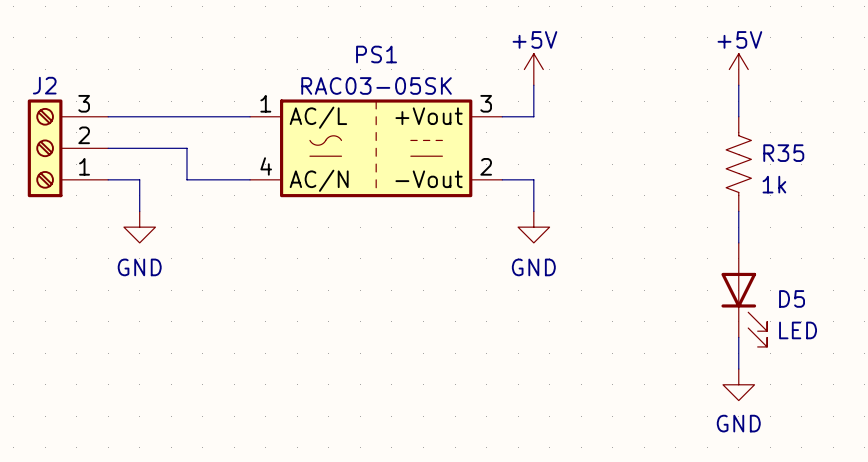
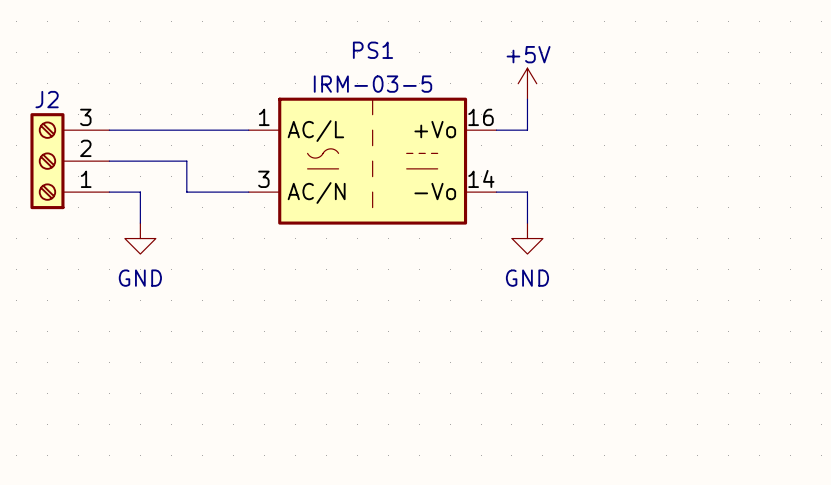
power symbol: +5V (738, 69) -> none
PS1 value: RAC03-05SK (376, 85) -> IRM-03-5 (373, 84)
wire: (738, 85) (738, 116) -> none
PS1 symbol: [250, 99, 503, 198] -> [248, 97, 497, 225]
R35: 1k (738, 164) -> none
wire: (738, 211) (738, 242) -> none
D5: LED (744, 294) -> none
wire: (738, 337) (738, 369) -> none
power symbol: GND (738, 384) -> none

